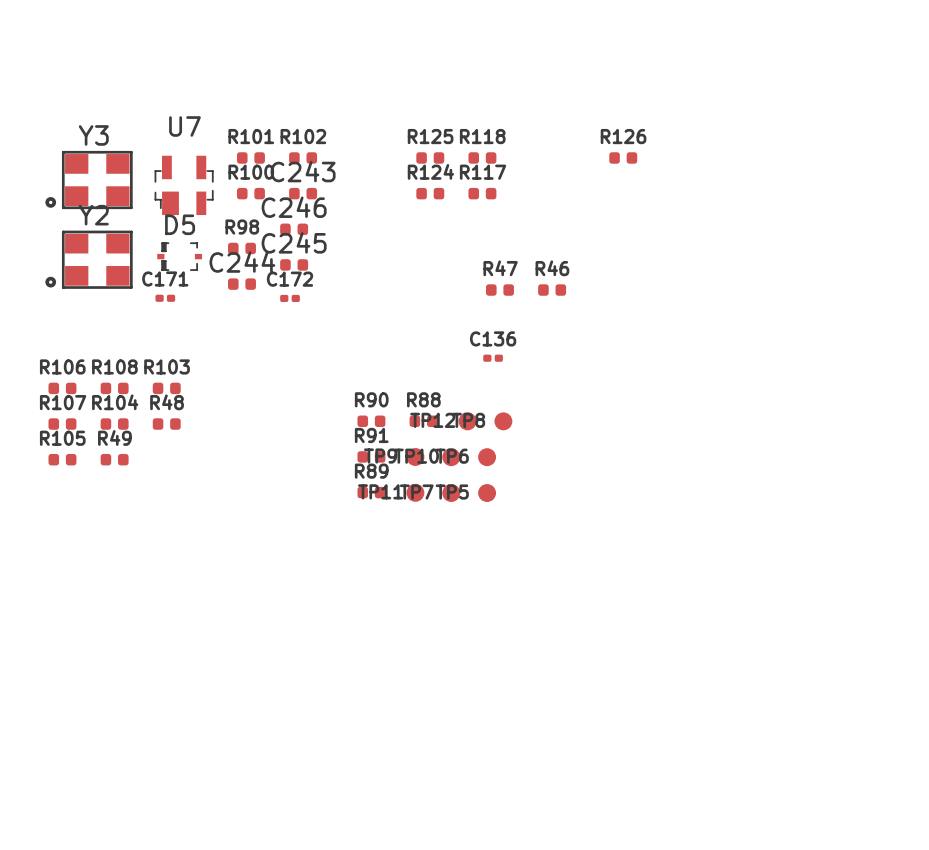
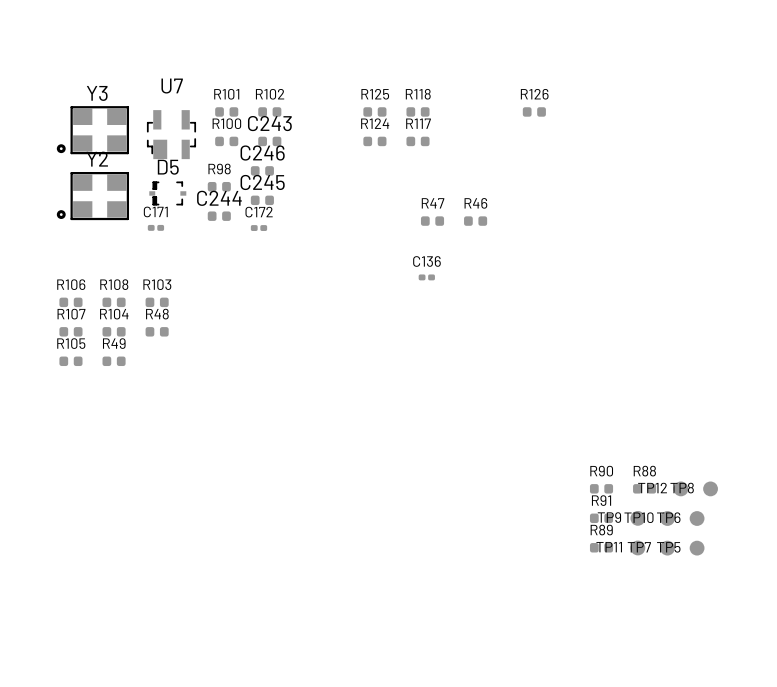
R90 position: (371, 421) -> (601, 488)
R88 position: (423, 421) -> (644, 488)
TP12 position: (467, 421) -> (680, 488)
TP8 position: (503, 421) -> (710, 488)
R91 position: (371, 456) -> (601, 518)
TP9 position: (415, 457) -> (637, 518)
TP10 position: (451, 457) -> (667, 518)
TP6 position: (487, 457) -> (697, 518)
R89 position: (371, 492) -> (601, 547)
TP11 position: (415, 492) -> (637, 547)
TP7 position: (451, 493) -> (667, 548)
TP5 position: (487, 493) -> (697, 548)

